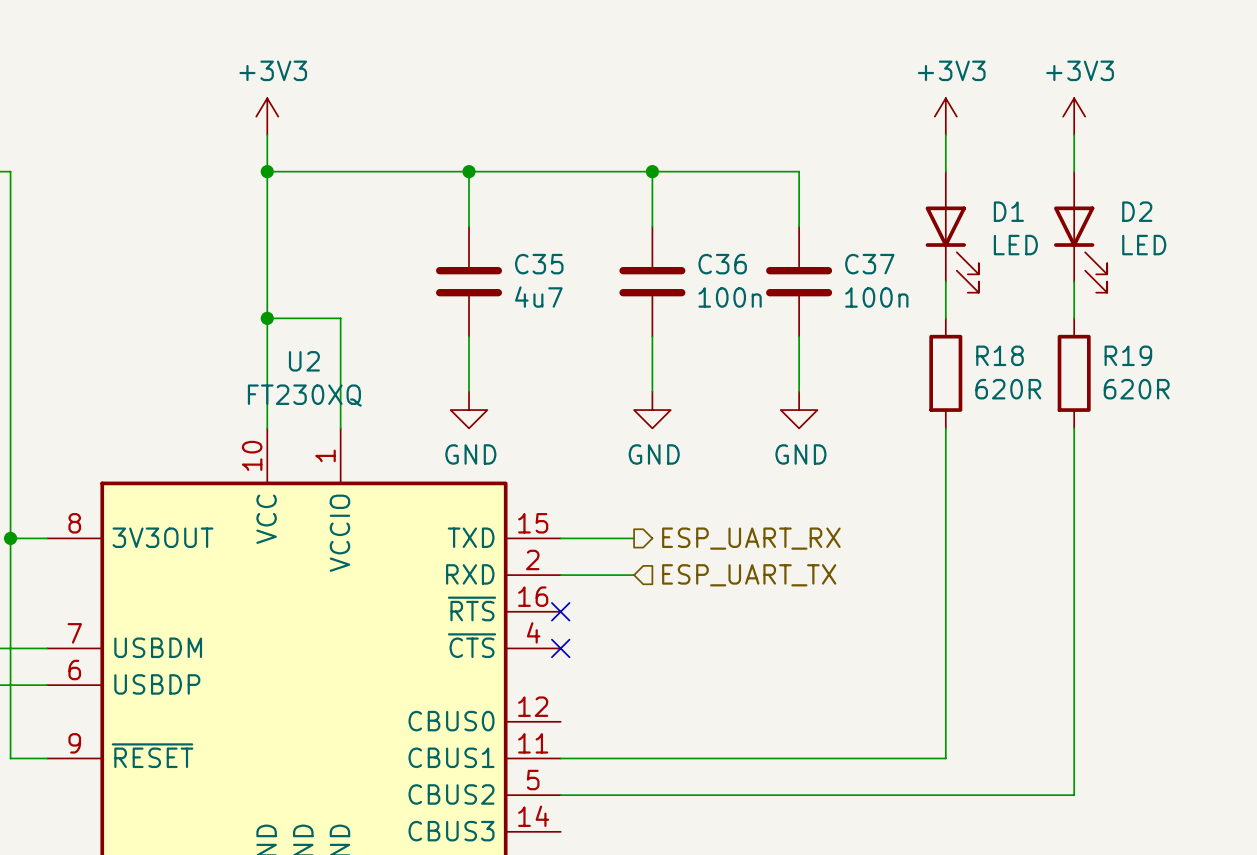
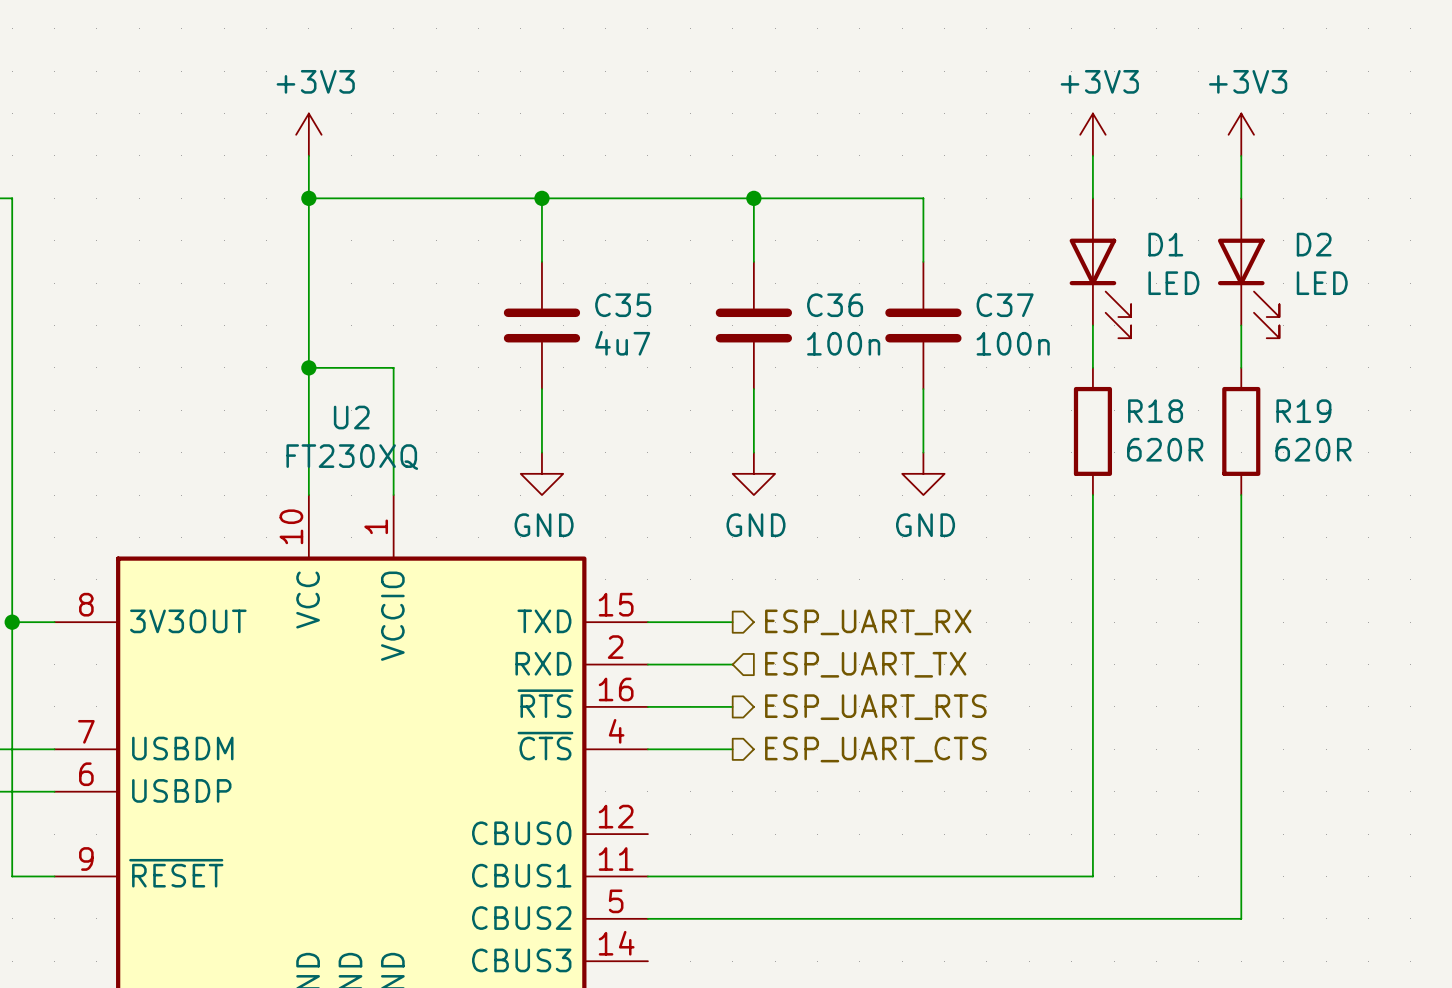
wire: none -> (647, 706) (732, 706)
no-connect mark: (560, 611) -> none
hierarchical label: none -> ESP_UART_RTS (875, 707)
wire: none -> (647, 749) (732, 749)
no-connect mark: (560, 648) -> none
hierarchical label: none -> ESP_UART_CTS (875, 749)

